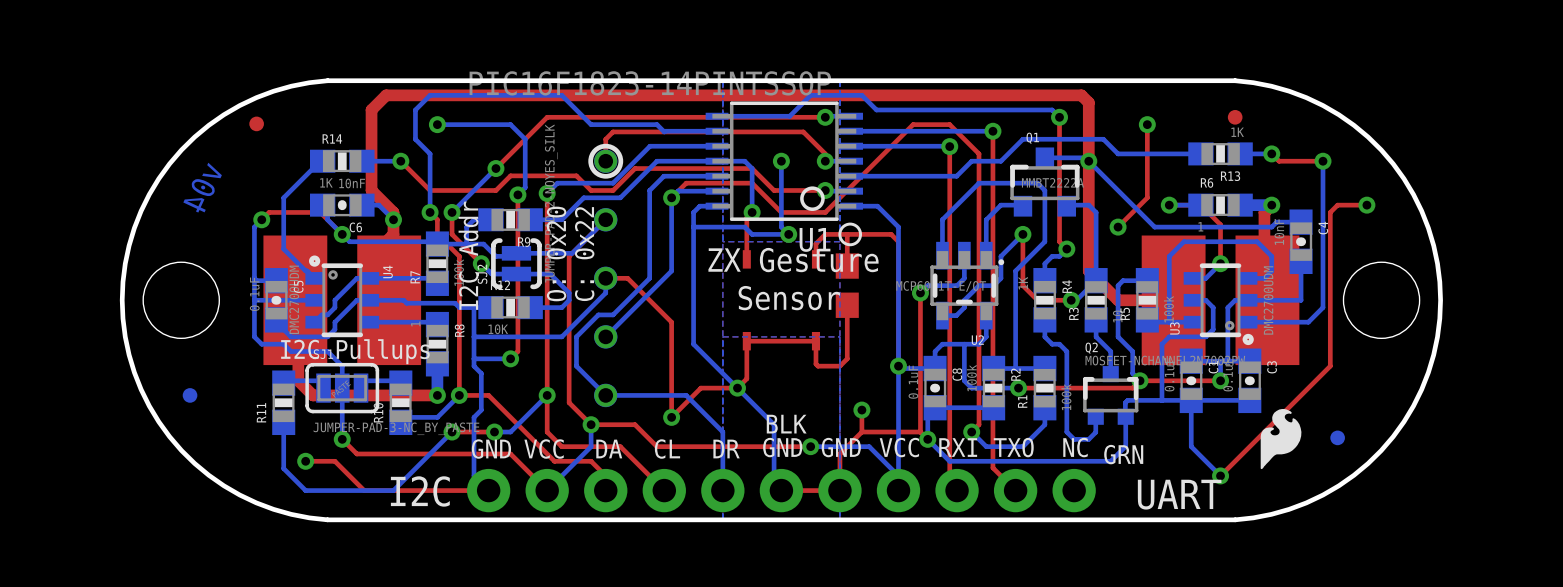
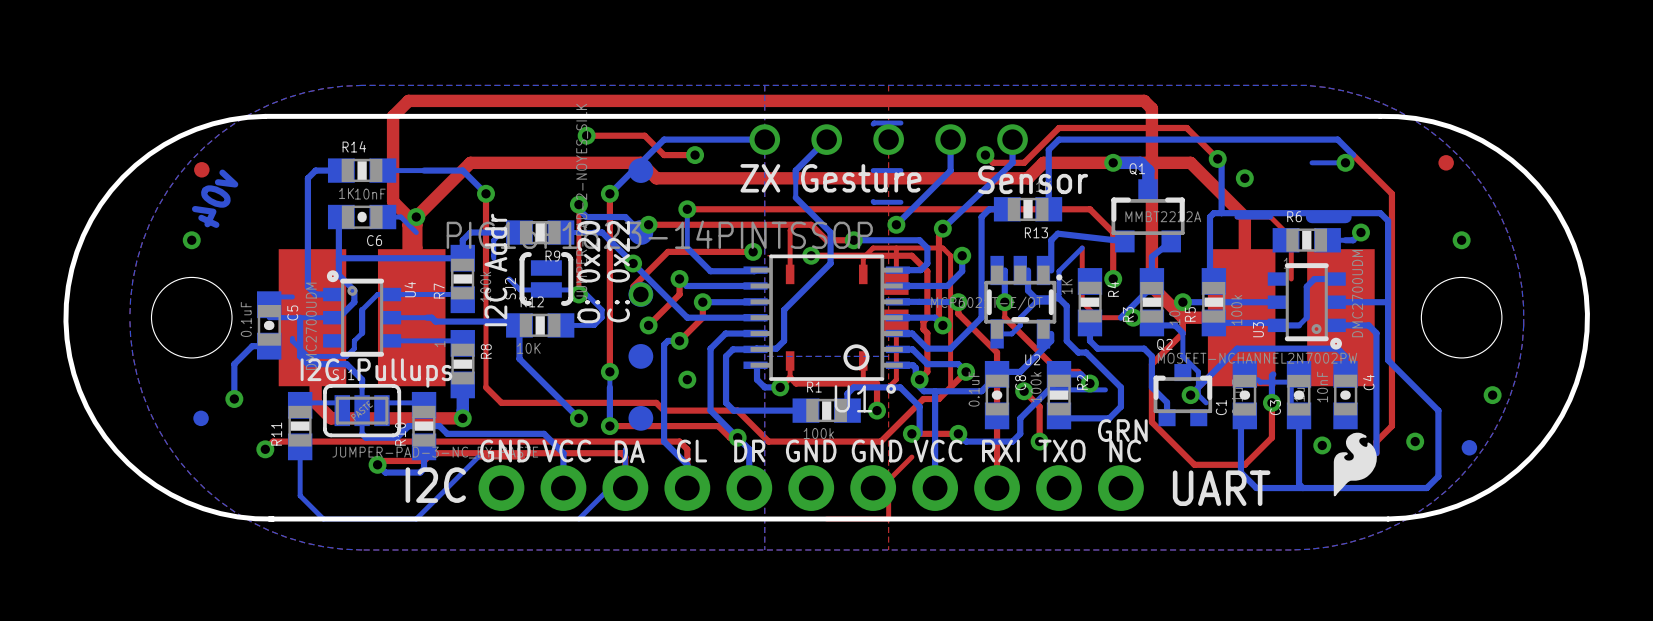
bottom zone outline: (839, 80) (839, 519) -> none
board edge: (1235, 80) (327, 80) (291, 86) (256, 97) (239, 105) (208, 125) (181, 149) (158, 178) (149, 194) (134, 228) (125, 263) (122, 281) (122, 318) (129, 354) (141, 389) (158, 421) (181, 450) (194, 463) (208, 475) (239, 495) (273, 509) (309, 517) (327, 519) (1235, 519) (1271, 514) (1306, 502) (1323, 495) (1353, 475) (1381, 450) (1404, 421) (1421, 389) (1433, 354) (1439, 318) (1439, 281) (1433, 245) (1421, 210) (1404, 178) (1381, 149) (1353, 125) (1323, 105) (1289, 91) (1253, 82) (1235, 80) -> none
U1 footprint: [705, 101, 864, 247] -> [743, 254, 910, 394]
via size: [816, 108, 834, 126] -> [873, 124, 904, 155]
bottom track: (717, 116) (789, 116) (810, 95) (861, 95) (876, 109) (1052, 109) (1059, 117) -> none
top track: (825, 117) (547, 117) (495, 168) -> none
top track: (1059, 117) (1059, 241) (1066, 249) -> none
via: (1059, 117) -> none
part position: (1235, 117) -> (1446, 162)
part position: (256, 123) -> (201, 169)
bottom track: (437, 124) (510, 124) (525, 139) (525, 187) (517, 194) -> none
via: (437, 124) -> none
top track: (1147, 124) (1147, 197) (1118, 227) -> none
via position: (1147, 124) -> (1217, 158)
top track: none -> (586, 135) (644, 135) (664, 155) (695, 155)
via: none -> (586, 135)
bottom track: (717, 131) (664, 131) (656, 124) (591, 124) (561, 95) (430, 95) (415, 109) (415, 139) (430, 153) (430, 212) -> none
bottom track: none -> (764, 139) (664, 139) (609, 193)
via: none -> (764, 139)
bottom track: none -> (826, 139) (795, 170) (795, 178)
via: none -> (826, 139)
bottom track: none -> (950, 139) (950, 170) (896, 224)
via: none -> (950, 139)
bottom track: none -> (1012, 139) (1012, 162) (942, 228)
via: none -> (1012, 139)
bottom track: (992, 131) (851, 131) -> none
top track: (992, 131) (992, 467) (1015, 490) -> none
via: (992, 131) -> none
drawing: [588, 143, 624, 179] -> none
via: none -> (695, 155)
bottom track: (717, 146) (650, 146) (613, 183) (557, 183) (547, 193) -> none
bottom track: (851, 146) (949, 146) -> none
top track: none -> (985, 155) (993, 162) (1024, 162) (1059, 127) (1186, 127) (1217, 158)
top track: (949, 146) (949, 285) -> none
via position: (949, 146) -> (985, 155)
bottom track: none -> (1353, 155) (1337, 139) (1059, 139) (1048, 149) (1048, 209)
top track: none -> (1353, 155) (1391, 193) (1391, 426) (1376, 441) (1376, 453)
bottom track: none -> (1217, 158) (1221, 162) (1221, 213)
bottom track: none -> (1113, 162) (1140, 162) (1148, 170) (1148, 190)
via: none -> (1113, 162)
bottom track: (1200, 153) (1118, 153) (1103, 139) (1022, 139) (1000, 161) (971, 161) (956, 176) (851, 176) -> none
R13 position: (1220, 153) -> (1028, 209)
top track: (1271, 153) (1279, 161) (1323, 161) -> none
bottom track: (1044, 157) (1085, 157) (1154, 227) (1254, 227) -> none
bottom track: (320, 161) (283, 197) (283, 249) (314, 278) -> (338, 170) (315, 170) (307, 178) (307, 286) (315, 294) (332, 294)
bottom track: none -> (424, 170) (462, 170) (486, 193)
top track: (400, 161) (430, 190) (495, 190) (510, 175) (576, 175) (591, 190) (613, 190) (635, 168) -> (408, 255) (408, 224) (470, 162) (640, 162) (656, 178) (671, 178)
via: (400, 161) -> none
via: (605, 161) -> none
bottom track: (781, 161) (781, 227) (788, 234) (752, 234) (744, 227) (693, 227) -> none
via: (781, 161) -> none
top track: (825, 161) (825, 153) (803, 131) (613, 131) (605, 139) (605, 161) -> none
via: (825, 161) -> none
via: (1088, 161) -> none
bottom track: (1323, 161) (1323, 307) (1308, 322) (1248, 322) -> none
via: (1323, 161) -> none
bottom track: (495, 168) (452, 212) -> none
via: (495, 168) -> none
bottom track: (752, 168) (744, 161) (656, 161) (620, 197) (583, 197) (561, 219) -> (755, 317) (687, 317) (602, 232) (594, 232)
top track: (752, 168) (774, 190) (825, 190) -> (795, 178) (1028, 178) (1043, 162) (1190, 162) (1244, 217) (1244, 340) (1190, 395)
top track width: thin (752, 168) (635, 168) -> thick (795, 178) (671, 178)
via: none -> (1244, 178)
bottom track: (717, 176) (663, 176) (649, 190) (649, 197) -> none
Q1 position: (1044, 182) -> (1148, 215)
via: none -> (486, 193)
top track: none -> (609, 193) (609, 371)
via: none -> (609, 193)
bottom track: (752, 186) (752, 212) -> (795, 197) (830, 232) (830, 263) (784, 309) (784, 340) (776, 348) (755, 349)
bottom track: (678, 190) (671, 197) (671, 271) (605, 336) -> none
via: (825, 190) -> none
bottom track: (717, 191) (678, 191) -> none
top track: (517, 194) (517, 351) (510, 358) -> none
via: (517, 194) -> none
bottom track: none -> (578, 209) (586, 217) (625, 217) (633, 224) (648, 224)
top track: none -> (687, 209) (1089, 209) (1113, 232) (1113, 278)
top track: (671, 197) (686, 183) (752, 183) (781, 212) (825, 212) (913, 124) (949, 124) (979, 153) (979, 424) (971, 432) -> none
via position: (671, 197) -> (687, 209)
bottom track: none -> (1007, 209) (989, 209) (981, 217) (981, 317) (950, 348) (927, 348) (912, 333) (898, 333)
bottom track: (322, 205) (327, 205) (327, 219) (349, 241) (437, 241) -> (341, 217) (338, 219) (338, 275) (354, 290) (354, 302) (338, 317) (332, 317)
via: (1169, 205) -> none
R6 position: (1220, 205) -> (1306, 240)
top track: (1271, 205) (1264, 212) (1264, 241) -> none
via position: (1271, 205) -> (1360, 232)
top track: (1366, 205) (1337, 205) (1330, 212) (1330, 366) (1220, 475) -> none
via position: (1366, 205) -> (1461, 240)
bottom track: (717, 206) (699, 206) (693, 212) (693, 344) (774, 424) (774, 483) (781, 490) -> none
bottom track: (851, 206) (877, 206) (898, 227) (898, 490) -> none
bottom track: (1022, 206) (1000, 205) (986, 219) (986, 255) -> none
bottom track: (1066, 206) (1088, 205) (1096, 212) (1096, 280) (1076, 300) (1071, 300) -> none
via size: [594, 208, 618, 232] -> [639, 215, 658, 234]
top track: (430, 212) (437, 219) (437, 234) (459, 256) -> (486, 193) (486, 271)
via: (430, 212) -> none
top track: (452, 212) (452, 234) (481, 263) -> none
via: (452, 212) -> none
top track: none -> (648, 224) (811, 224) (826, 240) (853, 240)
via: (752, 212) -> none
via: none -> (896, 224)
top track: none -> (942, 228) (938, 236) (938, 321) (942, 325)
via: none -> (942, 228)
bottom track: (261, 219) (254, 227) (254, 336) (261, 344) (283, 344) (291, 351) (327, 351) (342, 366) -> (300, 317) (300, 356) (307, 364) (346, 364) (362, 379) (362, 387)
top track: (261, 219) (269, 212) (320, 212) (342, 234) -> none
via: (261, 219) -> none
via position: (393, 219) -> (416, 217)
bottom track: none -> (501, 232) (470, 232) (462, 240) (462, 255)
bottom track: (605, 219) (572, 253) (516, 253) (513, 256) (495, 256) (483, 244) (437, 244) -> (338, 259) (462, 258)
top track: (605, 219) (569, 256) (569, 402) (591, 424) (635, 424) (656, 446) (810, 446) -> none
bottom track: (1301, 222) (1276, 222) (1271, 227) -> (1360, 232) (1353, 240) (1345, 240)
via: none -> (191, 240)
bottom track: none -> (853, 240) (919, 240) (927, 248) (927, 263) (920, 270) (897, 270)
via: none -> (853, 240)
via: (1118, 227) -> none
bottom track: none -> (1124, 241) (1057, 233) (1051, 240) (1051, 270)
bottom track: none -> (1171, 241) (1151, 256) (1151, 286) (1120, 317)
via: (342, 234) -> none
bottom track: (649, 234) (649, 278) (613, 314) (598, 314) (576, 336) (576, 351) -> (687, 248) (710, 271) (755, 270)
via: (788, 234) -> none
via: (1022, 234) -> none
top track: none -> (753, 251) (667, 251) (633, 286)
via: none -> (753, 251)
top track: none -> (811, 255) (911, 255) (927, 271) (927, 317) (923, 321) (923, 329) (927, 333) (927, 371) (919, 379)
via: none -> (811, 255)
bottom zone outline: (839, 241) (722, 241) -> none
bottom track: none -> (962, 255) (962, 271) (947, 285) (897, 285)
via: none -> (962, 255)
C4 position: (1301, 241) -> (1345, 395)
via: none -> (633, 263)
bottom track: (1066, 249) (1059, 256) (1052, 256) (1044, 263) (1044, 280) -> none
via position: (1066, 249) -> (1113, 278)
bottom track: (942, 255) (942, 219) (979, 183) (1037, 183) (1044, 190) (1044, 241) (1015, 271) (1015, 368) -> none
bottom track: none -> (1004, 270) (1004, 302)
bottom track: (964, 255) (964, 278) (957, 285) (927, 285) (920, 292) -> none
bottom track: none -> (1028, 270) (1028, 290) (1035, 298) (1059, 298) (1066, 306) (1066, 340) (1078, 352) (1086, 352) (1120, 387) (1120, 406) (1109, 418) (1061, 418) (1059, 415) (1053, 415) (1051, 418)
text position: ZX Gesture (793, 260) -> ZX Gesture (830, 178)
bottom track: (1301, 261) (1301, 300) (1235, 300) -> (1336, 279) (1314, 279) (1306, 286) (1306, 317)
via: (481, 263) -> none
bottom track: none -> (679, 278) (686, 285) (755, 285)
top track: none -> (679, 278) (679, 294) (648, 325)
via: none -> (679, 278)
bottom track: (1220, 263) (1205, 278) (1192, 278) -> none
via: (1220, 263) -> none
bottom track: none -> (1213, 281) (1209, 277) (1209, 217) (1213, 213) (1380, 213) (1388, 220) (1388, 360) (1438, 410) (1438, 476) (1426, 488) (1256, 488) (1240, 472) (1240, 419) (1244, 415)
top track: (547, 278) (547, 432) (561, 446) (620, 446) (664, 490) -> none
via: none -> (578, 294)
bottom track: (605, 278) (605, 292) (561, 336) (474, 336) -> none
top track: (605, 278) (627, 278) (671, 322) (671, 417) (700, 388) (737, 388) (746, 378) (746, 356) -> none
bottom track: (1248, 278) (1264, 278) (1271, 271) (1271, 256) (1257, 241) (1183, 241) (1169, 256) (1169, 322) -> none
bottom track: (1147, 280) (1123, 280) (1118, 285) (1118, 314) -> (1151, 322) (1154, 325) (1175, 325) (1182, 333)
top track: none -> (702, 302) (702, 317) (679, 340)
via: none -> (702, 302)
bottom track: none -> (755, 301) (702, 302)
bottom track: none -> (897, 301) (958, 302)
top track: none -> (958, 302) (958, 313) (997, 352) (997, 488)
via: none -> (1004, 302)
top track: none -> (1182, 302) (1182, 333) (1151, 364) (1151, 422) (1194, 464) (1244, 464) (1271, 437) (1271, 402)
via: none -> (1182, 302)
bottom track: none -> (1277, 302) (1182, 302)
bottom track: none -> (1388, 302) (1330, 302)
bottom track: (342, 292) (334, 300) (334, 307) (327, 314) (321, 314) (314, 322) -> (362, 309) (362, 333)
top track: (920, 292) (920, 432) -> none
via position: (920, 292) -> (958, 302)
text position: Sensor (789, 298) -> Sensor (1033, 179)
C5 position: (276, 300) -> (269, 325)
bottom track: (369, 300) (356, 300) (342, 314) -> none
bottom track: (403, 300) (406, 303) (454, 303) (459, 307) (491, 307) -> (427, 317) (431, 317) (435, 321) (515, 321) (519, 325) (519, 358) (578, 418)
bottom track: none -> (897, 317) (935, 317) (942, 325)
top track: (949, 300) (949, 483) (957, 490) -> (1004, 317) (1059, 371) (1078, 371) (1089, 383)
R4 position: (1044, 300) -> (1089, 302)
R3 position: (1096, 300) -> (1151, 302)
R5 position: (1147, 300) -> (1213, 302)
bottom track: (1192, 300) (1205, 300) (1213, 307) (1213, 329) (1205, 336) (1169, 336) (1161, 344) (1161, 400) -> none
U3 position: (1220, 304) -> (1306, 306)
bottom track: none -> (1089, 322) (1089, 340) (1097, 348) (1144, 348) (1151, 356) (1151, 387) (1167, 402) (1167, 417)
bottom track: (474, 307) (474, 366) (481, 373) (481, 410) (474, 417) (474, 475) (488, 490) -> none
via: none -> (648, 325)
via: none -> (942, 325)
bottom track: (1227, 307) (1227, 361) (1249, 361) (1252, 358) -> (1299, 325) (1277, 325) (1275, 322) (1213, 322)
bottom track: none -> (1336, 325) (1368, 325) (1376, 333) (1376, 453)
bottom track: none -> (755, 333) (725, 333) (710, 348) (710, 410) (749, 449) (749, 488)
bottom track: (986, 315) (986, 336) (979, 344) (942, 344) (935, 351) (935, 368) (900, 368) (898, 366) -> none
bottom track: none -> (1051, 333) (1051, 340) (1020, 371) (999, 371) (981, 391) (923, 391) (915, 383) (915, 368) (912, 365) (897, 365)
bottom track: (1044, 319) (1044, 336) (1052, 344) (1059, 344) (1066, 351) (1066, 432) (1074, 439) (1088, 439) (1095, 432) (1095, 416) -> none
bottom track: (1096, 319) (1096, 336) (1110, 351) (1110, 374) -> none
bottom track: (1147, 319) (1149, 322) (1192, 322) -> none
bottom track: none -> (679, 340) (667, 340) (664, 344) (664, 441) (687, 464) (687, 488)
via: none -> (679, 340)
bottom track: none -> (269, 346) (252, 346) (234, 364) (234, 399)
bottom track: none -> (755, 349) (733, 349) (726, 356) (726, 402) (733, 410) (805, 410)
bottom track: none -> (897, 349) (912, 349) (927, 364) (958, 364) (966, 371)
via: (605, 336) -> none
top track: (815, 341) (746, 341) -> none
bottom track: (964, 344) (964, 380) (971, 388) (1018, 388) -> none
bottom track: none -> (755, 365) (757, 379) (764, 387) (780, 387)
via: none -> (609, 371)
bottom track: none -> (1273, 374) (1271, 402)
bottom track: none -> (1345, 374) (1345, 356) (1337, 348) (1237, 348) (1190, 395)
bottom track: (510, 358) (474, 358) -> none
via: (510, 358) -> none
via: none -> (687, 379)
via: none -> (919, 379)
bottom track: none -> (1089, 383) (1080, 374) (1059, 374) (1059, 379) (1020, 418) (1020, 433) (1012, 441) (966, 441) (958, 433)
via: none -> (1089, 383)
top track: (459, 366) (459, 395) (488, 395) (554, 461) (591, 461) (605, 475) (605, 490) -> (486, 387) (501, 402) (656, 402) (664, 410) (737, 410) (768, 441) (880, 441) (923, 399) (938, 399) (966, 371)
bottom track: (576, 366) (605, 395) (686, 395) (722, 432) (722, 490) -> (609, 387) (609, 426)
top track: none -> (780, 387) (790, 377) (796, 383) (877, 383) (877, 410)
via position: (898, 366) -> (966, 371)
C1 name position: C1 (1213, 367) -> C1 (1221, 407)
C3 name position: C3 (1272, 367) -> C3 (1275, 407)
bottom track: none -> (935, 391) (935, 488)
top track: none -> (1024, 391) (1039, 406) (1039, 441)
via: none -> (1024, 391)
via: none -> (1492, 395)
via: none -> (234, 399)
via position: (1140, 380) -> (1190, 395)
C1 position: (1191, 380) -> (1244, 395)
top track: (1220, 380) (1140, 380) (1132, 388) (1018, 388) -> none
via position: (1220, 380) -> (1271, 402)
C3 position: (1249, 380) -> (1299, 395)
via position: (737, 388) -> (780, 387)
bottom track: none -> (847, 410) (847, 393) (853, 387) (900, 387) (919, 406) (919, 433)
via: none -> (877, 410)
C8 position: (935, 388) -> (997, 395)
R2 position: (993, 388) -> (1059, 395)
via: (1018, 388) -> none
R1 rotation: 0° (1044, 388) -> 90° clockwise (826, 410)
R1 position: (1044, 388) -> (826, 410)
bottom track: none -> (1299, 415) (1299, 484) (1302, 488)
bottom track: (459, 395) (437, 417) (400, 417) (400, 422) -> (377, 464) (385, 472) (420, 472) (424, 468) (424, 446)
via: (459, 395) -> none
bottom track: (547, 395) (510, 432) (494, 432) -> none
via: (605, 395) -> none
Q2 position: (1110, 395) -> (1182, 395)
bottom track: (1191, 400) (1191, 446) (1220, 475) -> none
bottom track: (1249, 400) (1127, 400) (1125, 402) (1125, 416) -> none
top track: none -> (609, 426) (718, 426) (729, 437) (737, 437)
bottom track: (993, 407) (935, 407) (927, 415) (927, 439) (949, 461) (1110, 461) (1125, 446) (1125, 416) -> none
bottom track: (1044, 407) (1044, 424) (1022, 446) (986, 446) (971, 432) -> none
bottom track: (342, 410) (342, 439) -> (362, 433) (365, 437) (396, 437) (408, 426) (439, 426) (447, 433) (544, 433) (563, 453) (563, 488)
top track: (861, 410) (861, 432) (920, 432) -> none
top track: none -> (958, 433) (919, 433)
via: none -> (958, 433)
via: none -> (737, 437)
via: (671, 417) -> none
via: none -> (1415, 441)
via: none -> (1322, 445)
top track: none -> (265, 449) (273, 441) (679, 441) (687, 449) (687, 488)
via: none -> (265, 449)
via position: (591, 424) -> (609, 426)
text: BLK (786, 424) -> none
via: (452, 432) -> none
via: (494, 432) -> none
via position: (971, 432) -> (1039, 441)
part position: (1337, 437) -> (1469, 447)
top track: (342, 439) (356, 453) (510, 453) (547, 490) -> none
via position: (342, 439) -> (377, 464)
top track: none -> (377, 464) (381, 460) (424, 460) (431, 453) (621, 453) (625, 457) (625, 488)
via: (927, 439) -> none
bottom track: (810, 446) (869, 446) (898, 475) -> none
via: (810, 446) -> none
text position: GND (782, 447) -> GND (811, 451)
text position: GND (841, 447) -> GND (877, 451)
text position: VCC (899, 447) -> VCC (938, 451)
text position: RXI (958, 447) -> RXI (1000, 451)
text position: TXO (1013, 447) -> TXO (1062, 451)
text position: NC (1075, 447) -> NC (1125, 451)
text position: GND (491, 449) -> GND (505, 451)
text position: VCC (544, 449) -> VCC (566, 451)
text position: DA (609, 449) -> DA (629, 451)
text position: CL (667, 449) -> CL (692, 451)
text position: DR (726, 449) -> DR (749, 451)
text position: GRN (1123, 454) -> GRN (1122, 430)
top track: (305, 461) (334, 461) (364, 490) (488, 490) -> none
via: (305, 461) -> none
via: (1220, 475) -> none
board edge: none -> (273, 519) (255, 518) (237, 516) (203, 508) (186, 502) (155, 485) (128, 463) (105, 436) (86, 406) (73, 373) (67, 339) (66, 303) (71, 269) (83, 235) (91, 219) (111, 190) (135, 165) (164, 144) (196, 129) (230, 119) (265, 116) (1380, 116) (1415, 118) (1432, 121) (1466, 132) (1497, 149) (1525, 171) (1548, 198) (1558, 213) (1573, 244) (1583, 278) (1586, 296) (1587, 331) (1581, 366) (1570, 399) (1552, 430) (1542, 444) (1517, 470) (1489, 490) (1457, 506) (1423, 515) (1388, 519) (269, 519)
part position: (605, 490) -> (625, 488)
part position: (927, 490) -> (966, 488)
text position: I2C (420, 491) -> I2C (435, 485)
text position: UART (1179, 494) -> UART (1221, 488)

